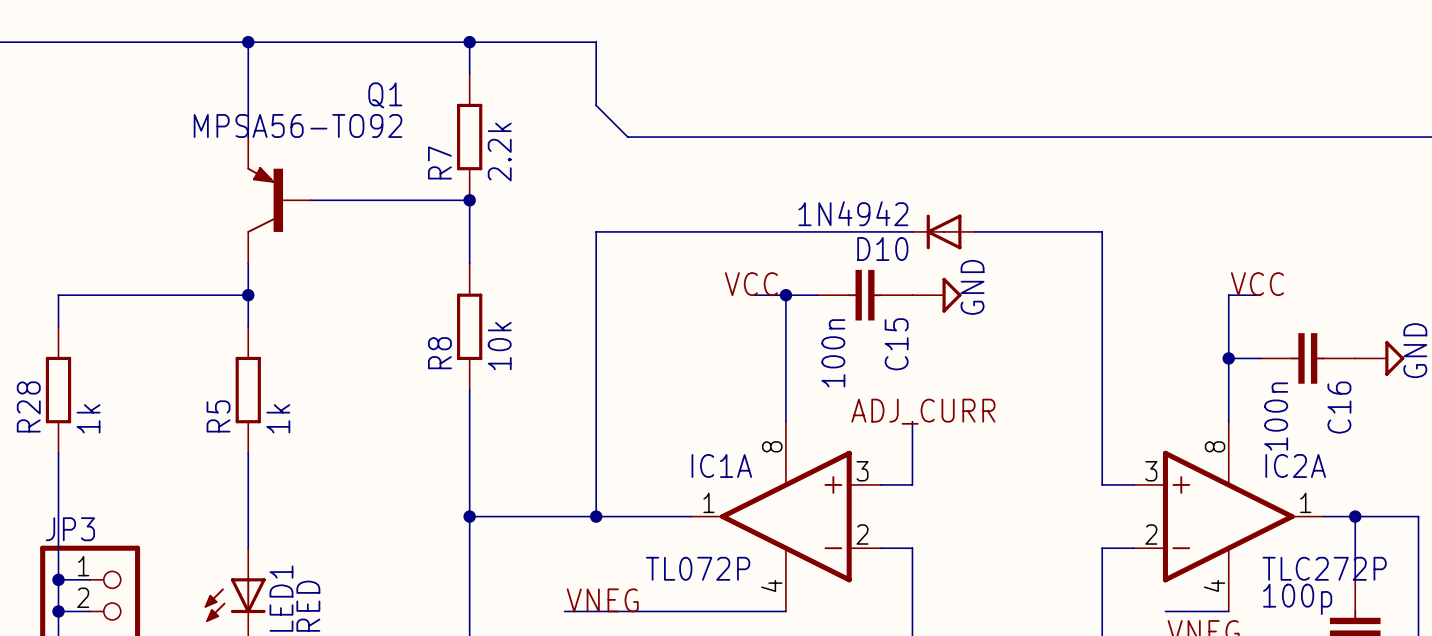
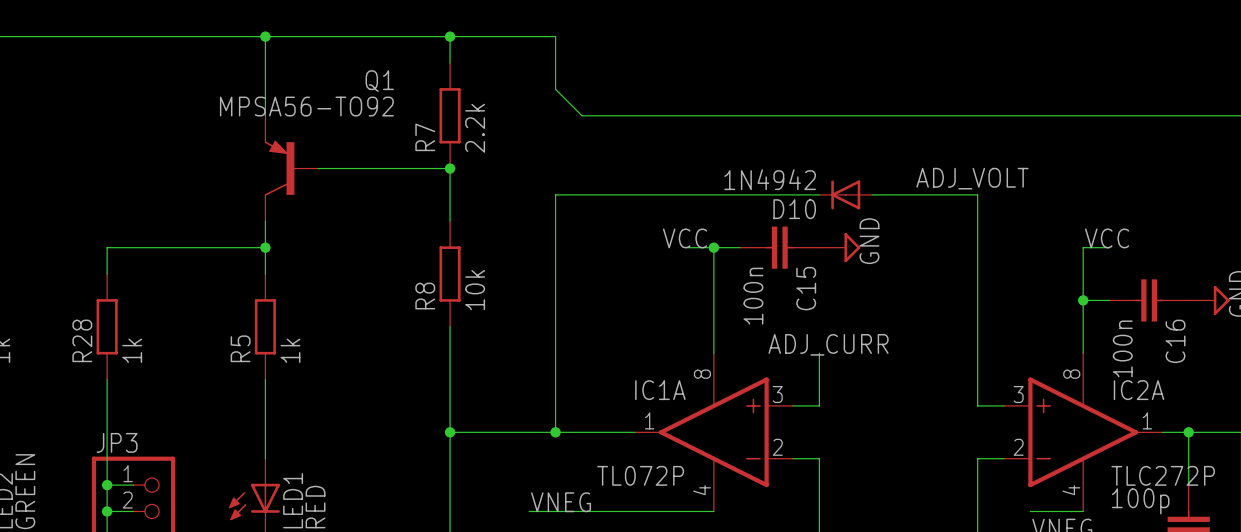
label: none -> ADJ_VOLT (972, 178)

